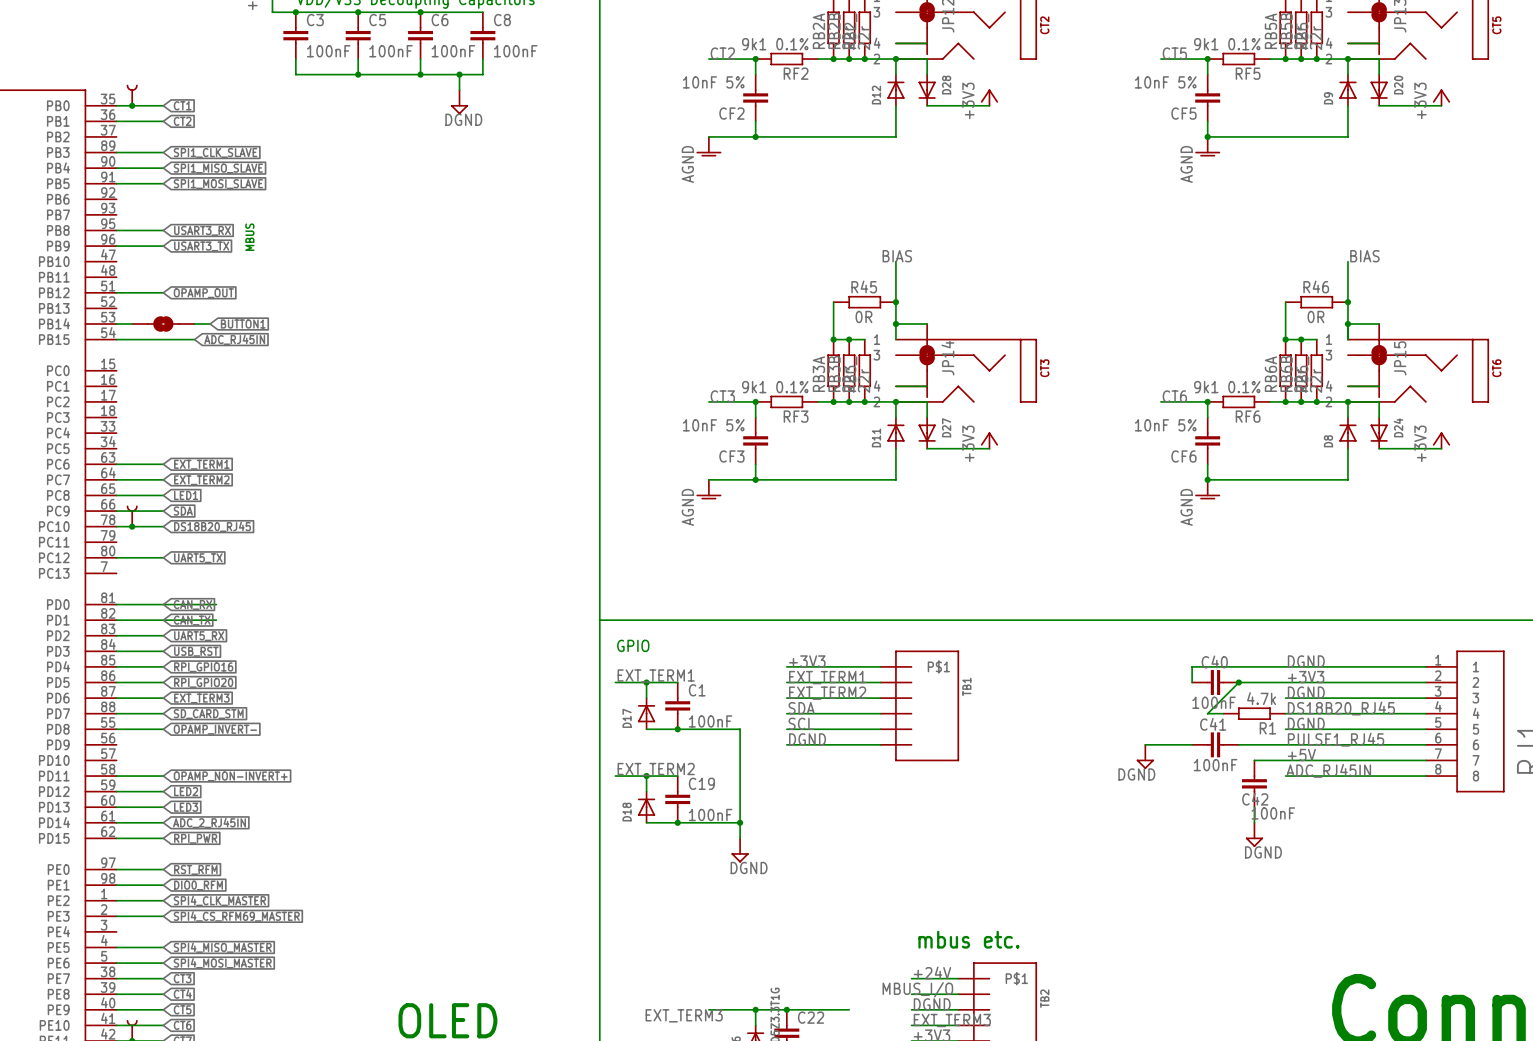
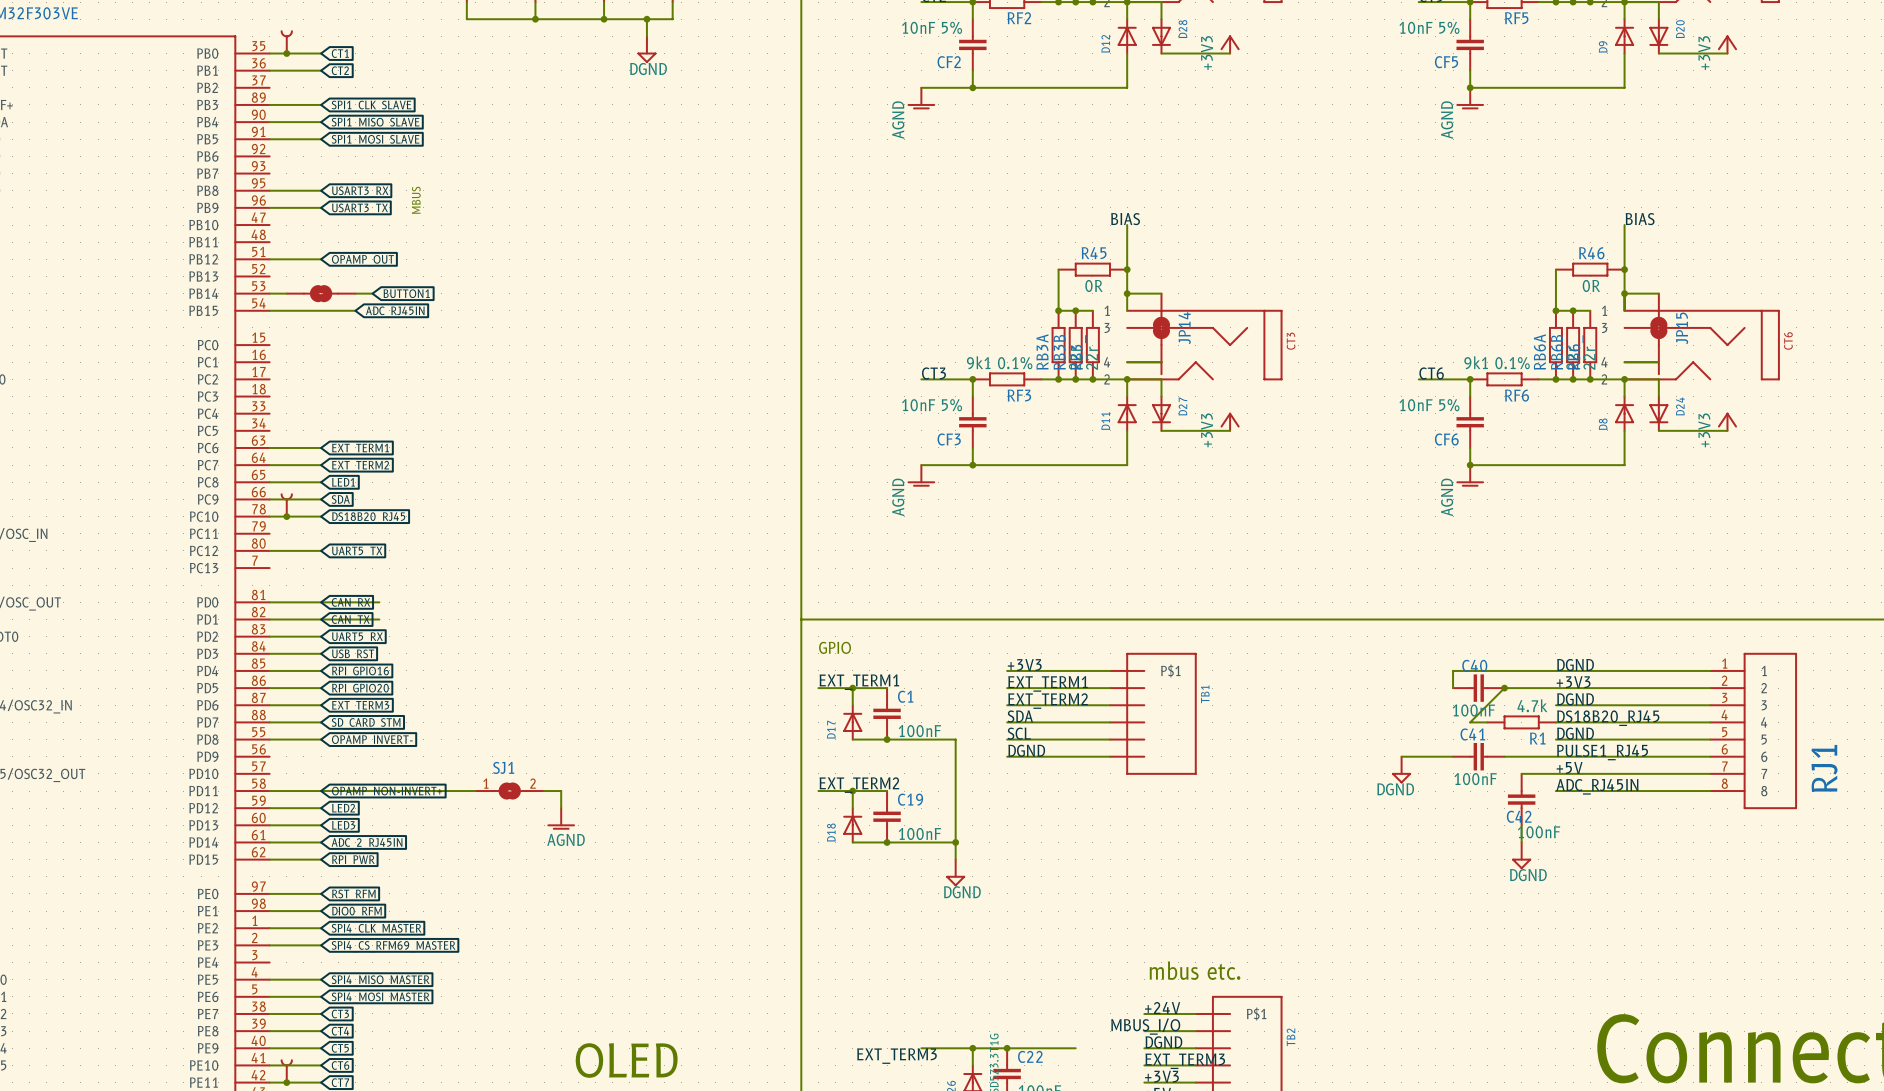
wire: none -> (321, 791) (475, 791)
SJ1: none -> (509, 791)
wire: none -> (544, 791) (561, 791) (561, 808)
power symbol: none -> AGND (561, 818)

